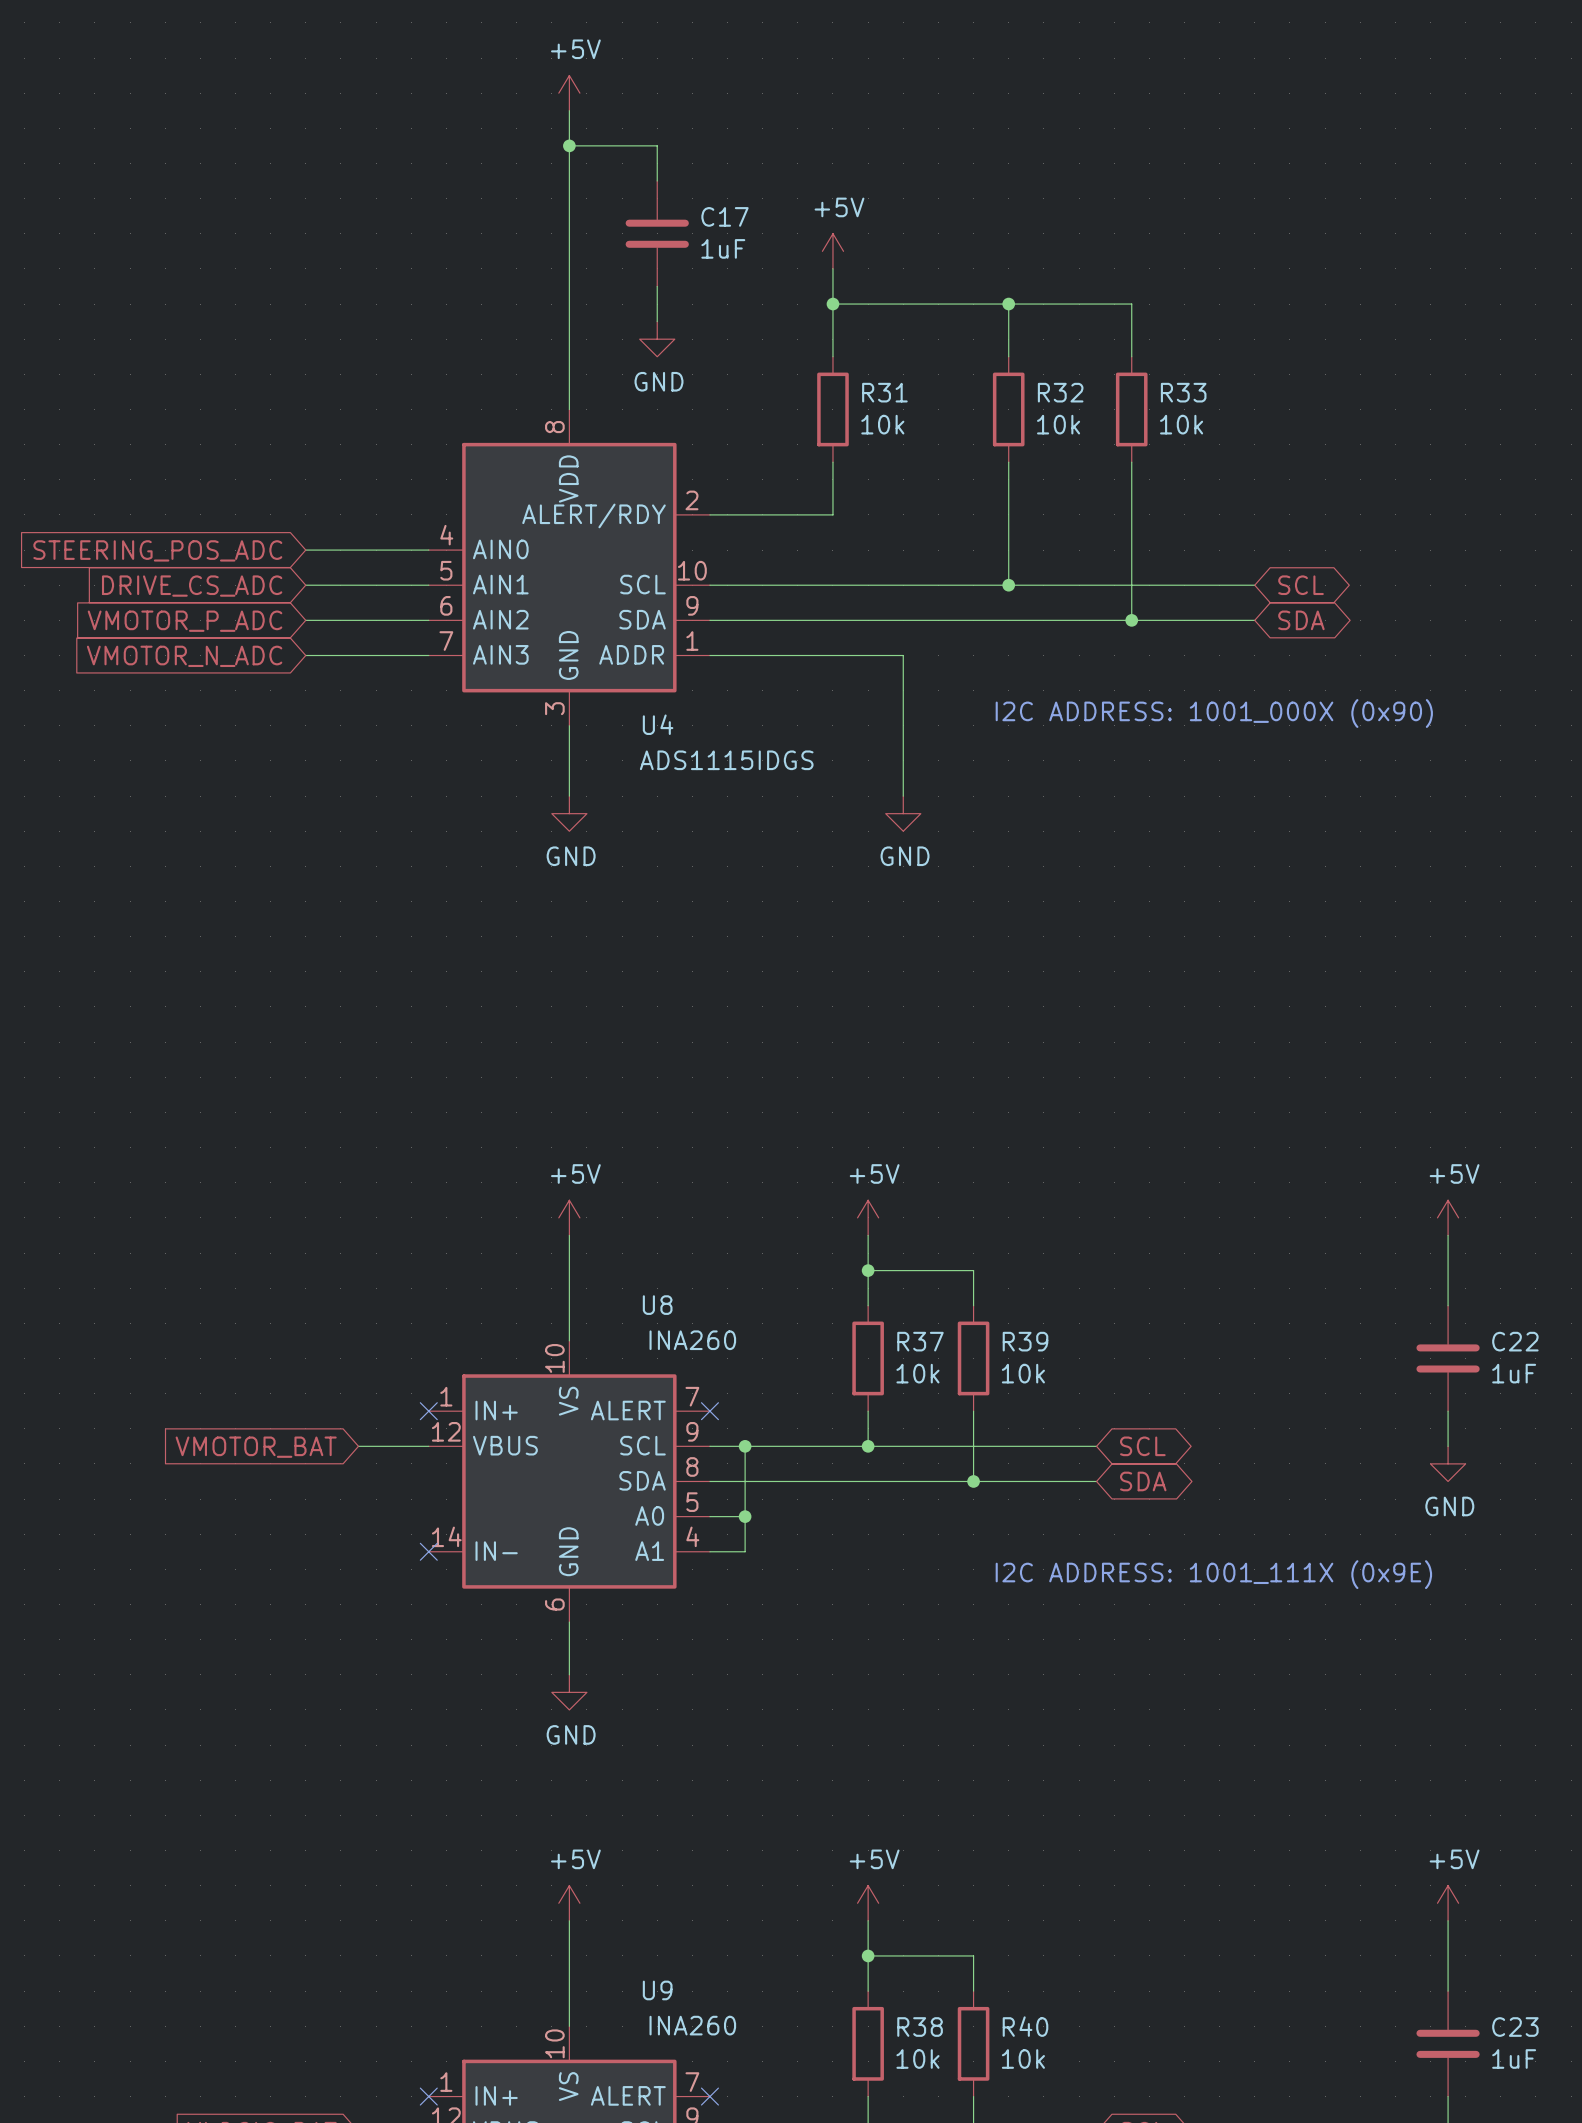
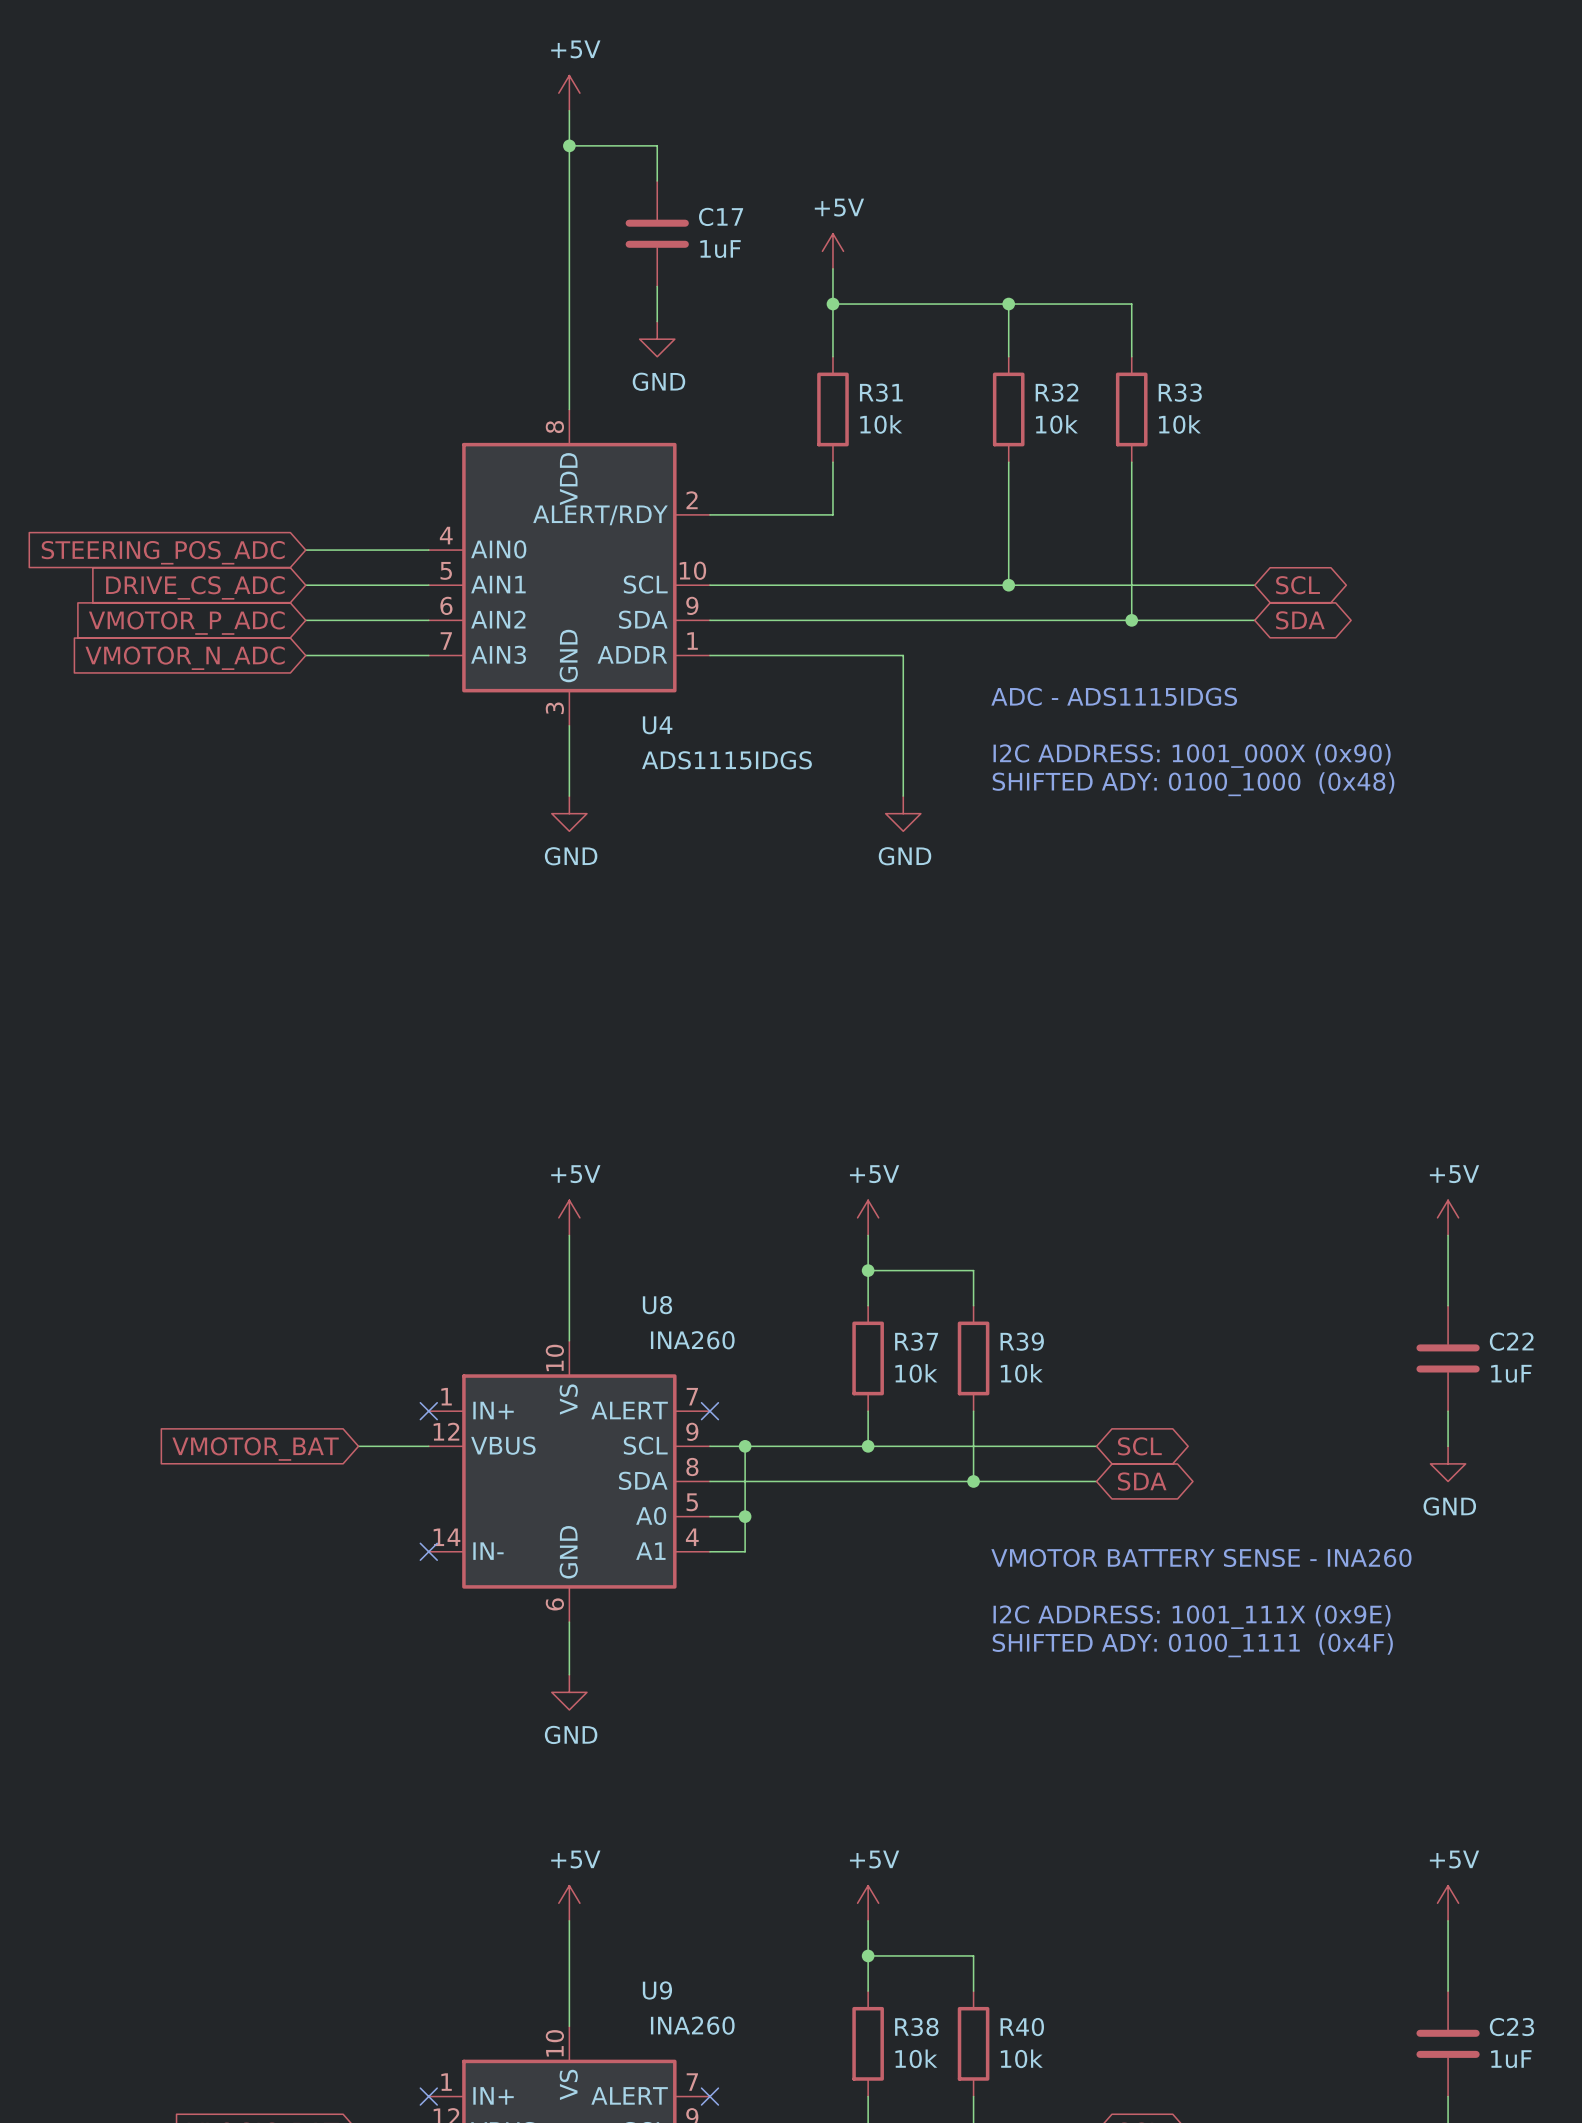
text: none -> ADC - ADS1115IDGS (1114, 696)
text position: I2C ADDRESS: 1001_000X (0x90) (1214, 713) -> I2C ADDRESS: 1001_000X (0x90) (1192, 755)
text: none -> SHIFTED ADY: 0100_1000 (0x48) (1193, 784)
text: none -> VMOTOR BATTERY SENSE - INA260 (1201, 1557)
text position: I2C ADDRESS: 1001_111X (0x9E) (1213, 1574) -> I2C ADDRESS: 1001_111X (0x9E) (1192, 1617)
text: none -> SHIFTED ADY: 0100_1111 (0x4F) (1192, 1645)

